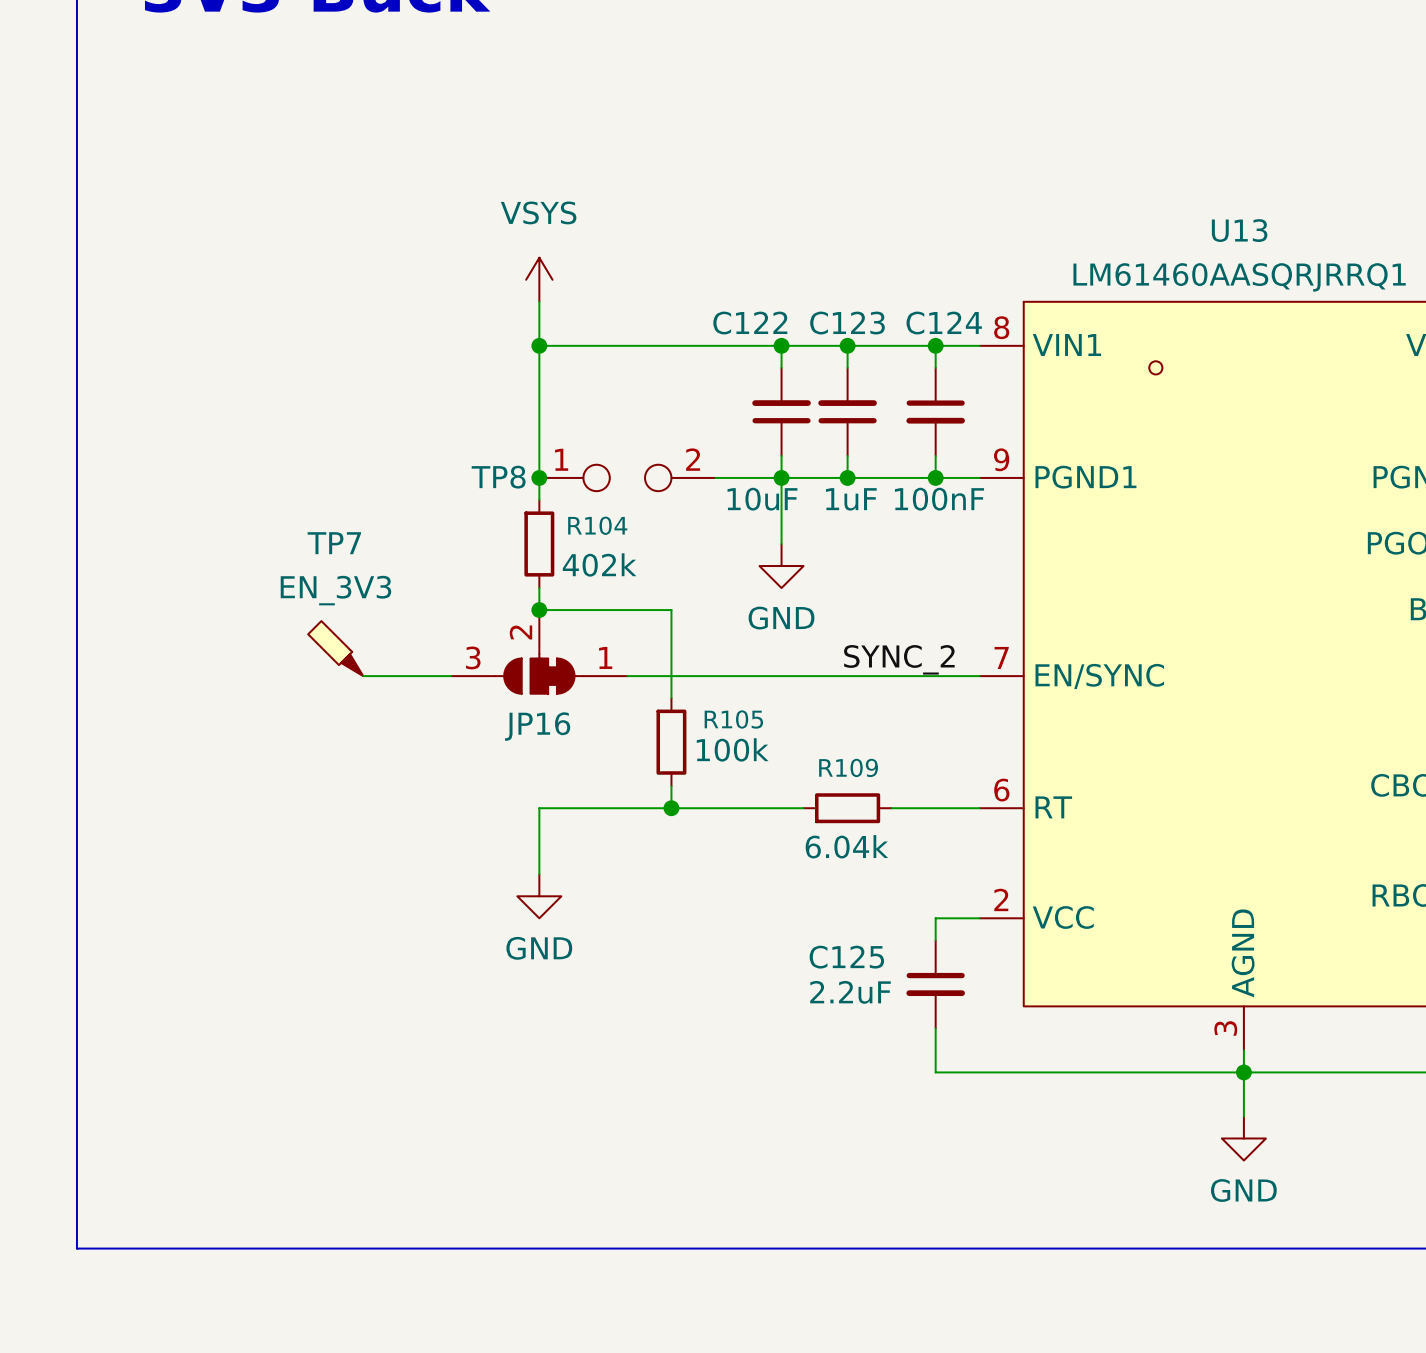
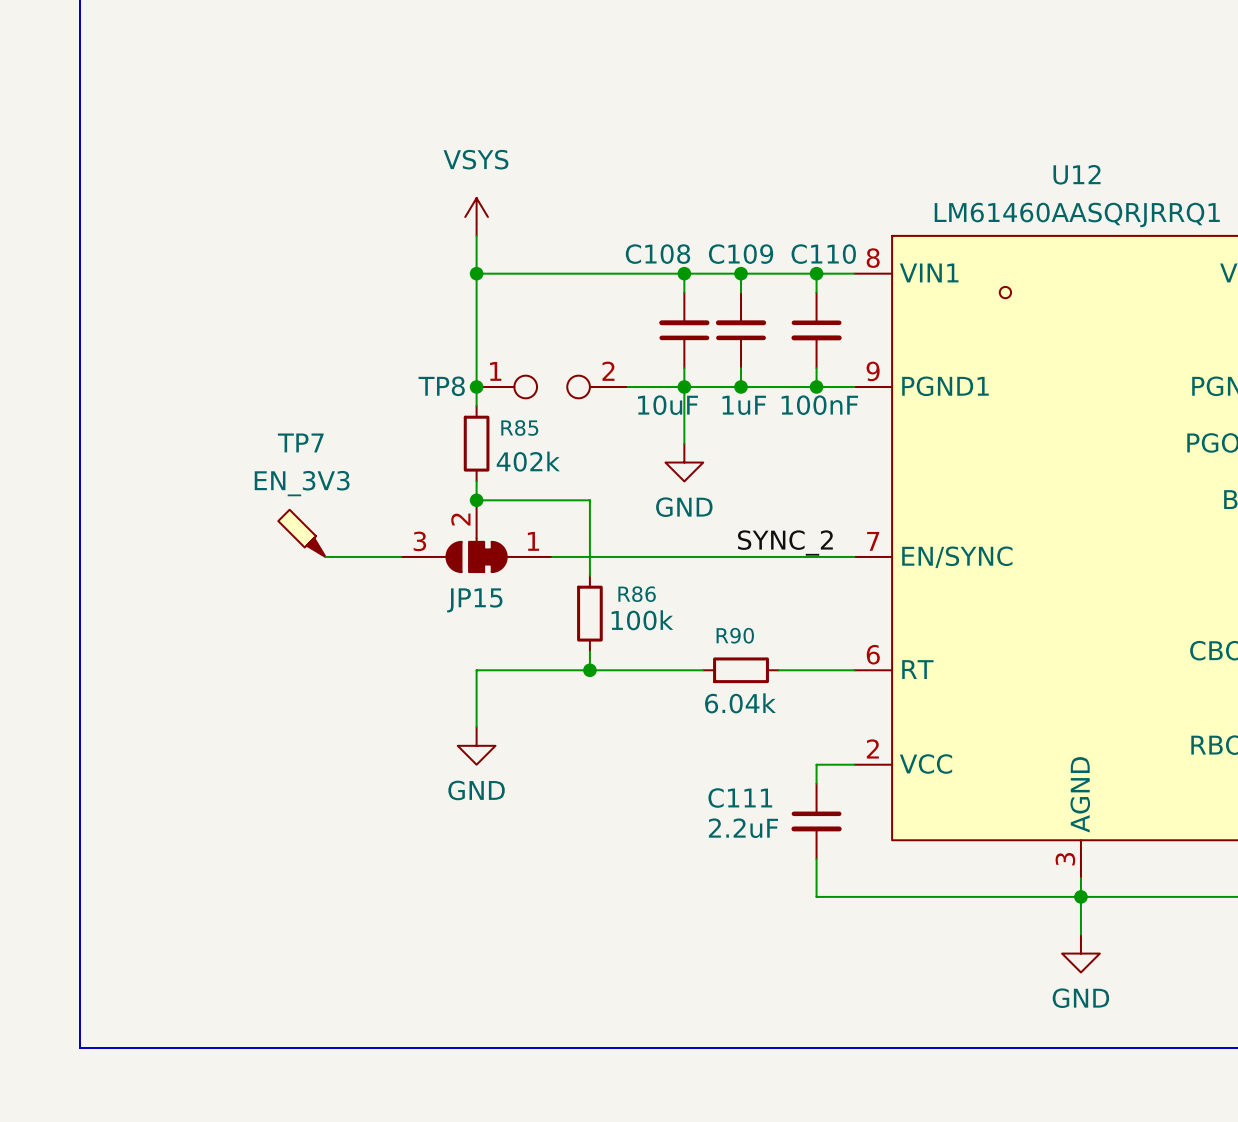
U13 name: U13 (1239, 230) -> U12 (1077, 174)
C122 name: C122 (750, 323) -> C108 (657, 254)
C123 name: C123 (847, 323) -> C109 (741, 254)
C124 name: C124 (944, 323) -> C110 (823, 254)
R104 name: R104 (597, 525) -> R85 (519, 427)
R105 name: R105 (733, 719) -> R86 (637, 594)
JP16 name: JP16 (537, 726) -> JP15 (474, 600)
R109 name: R109 (848, 767) -> R90 (735, 635)
C125 name: C125 (846, 957) -> C111 (740, 798)

